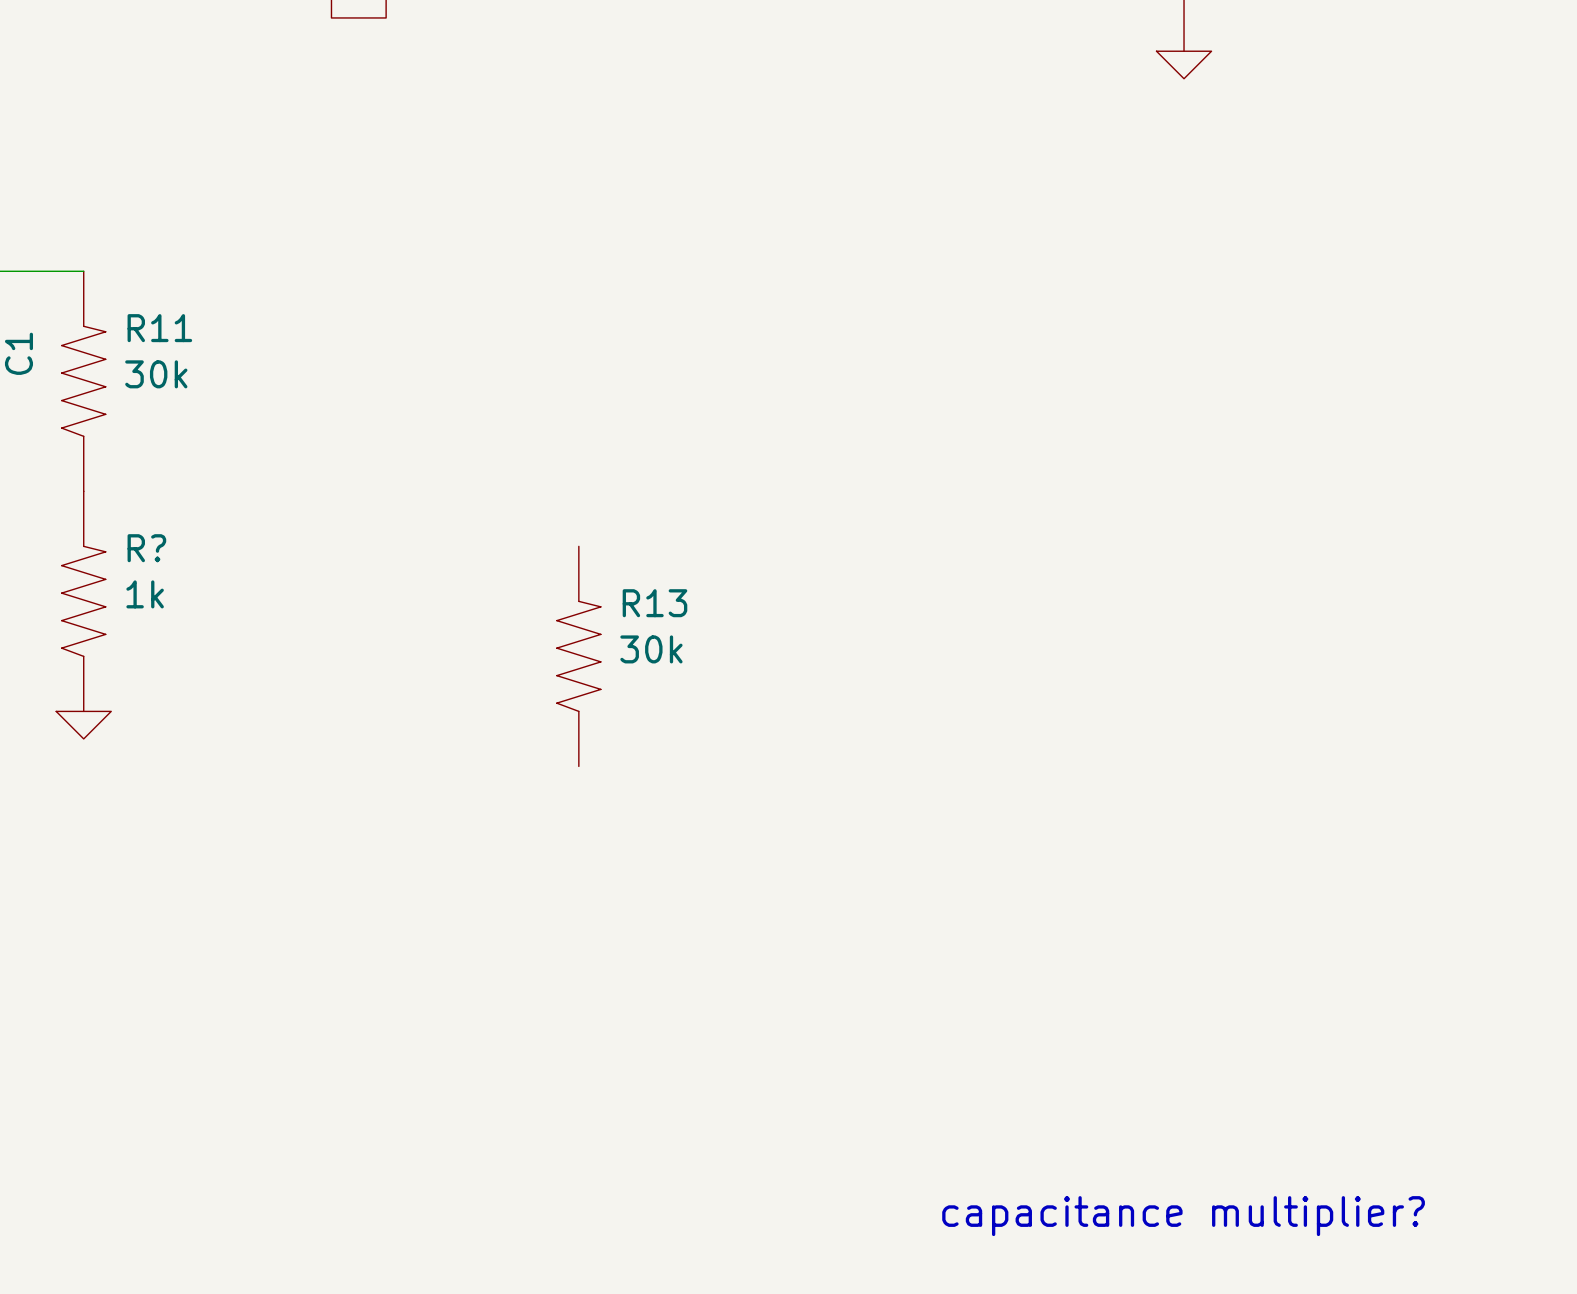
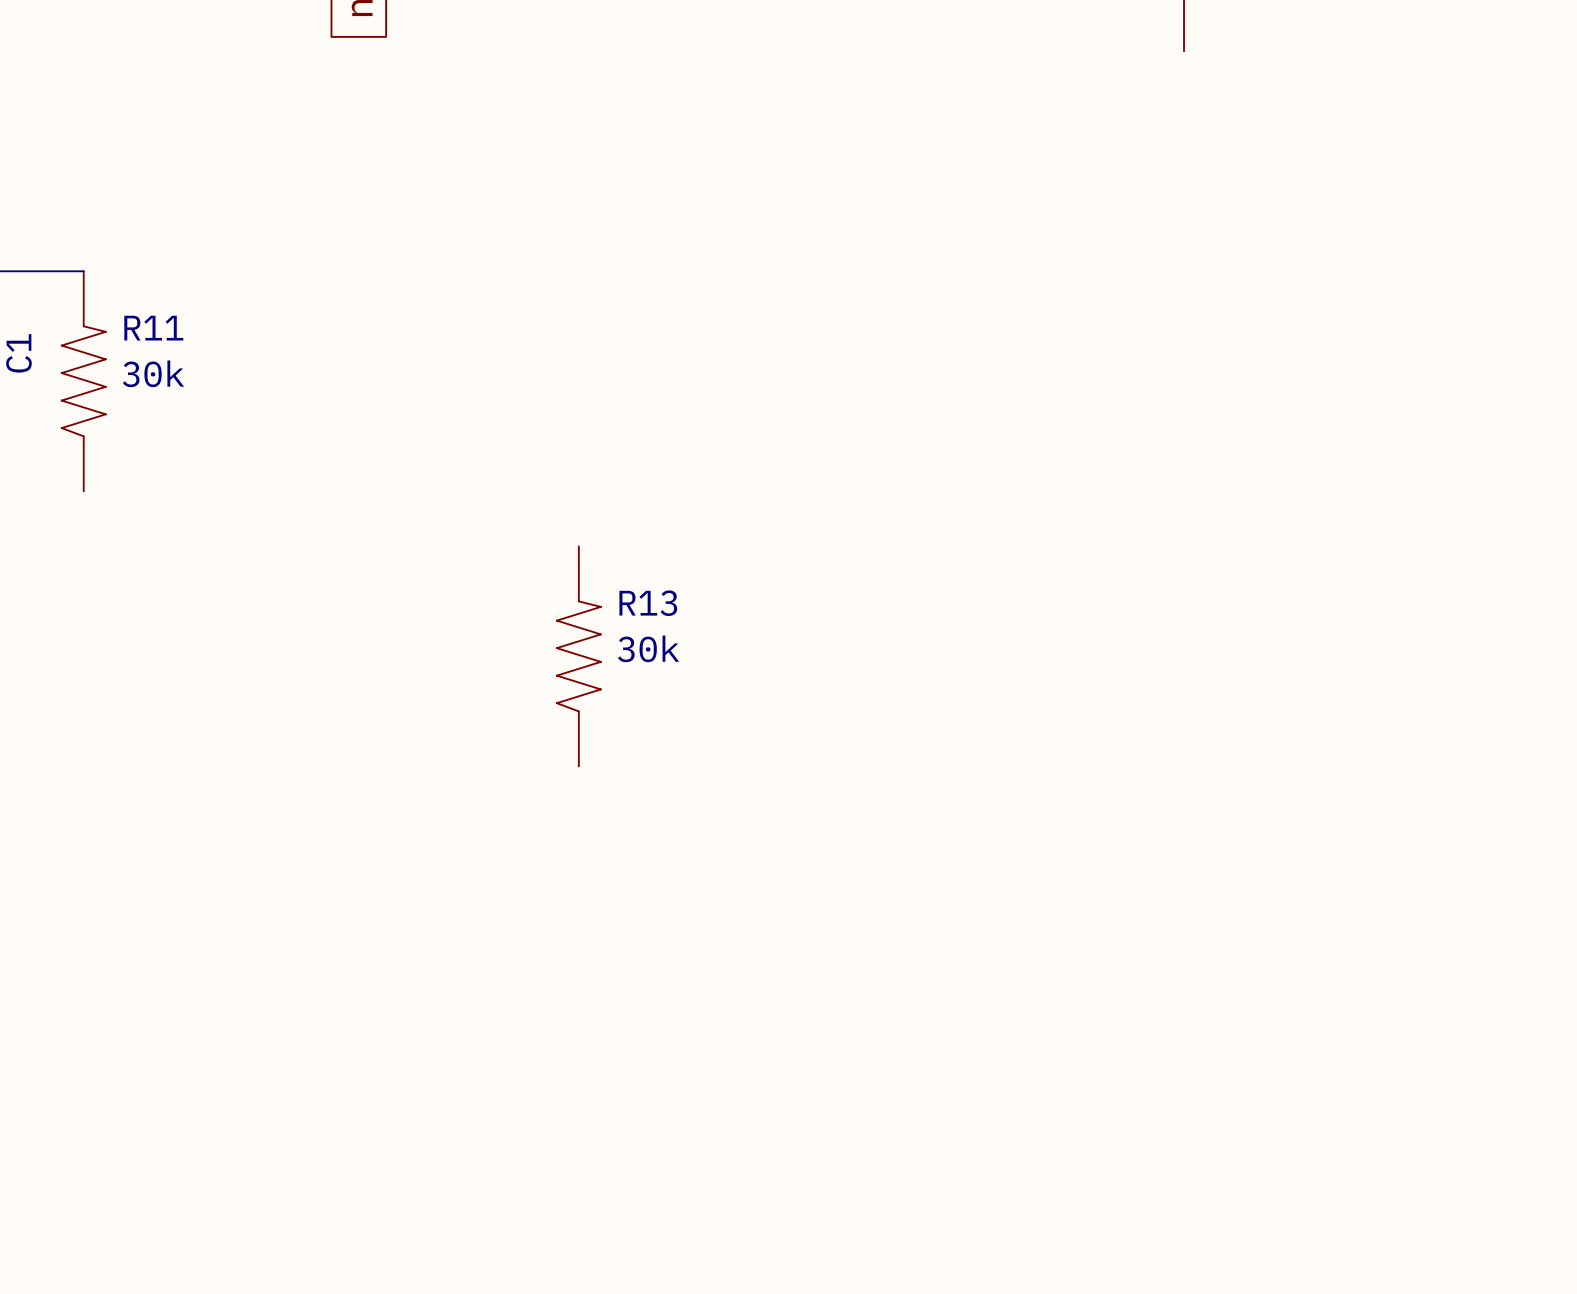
power symbol: (1184, 64) -> none
R?: 1k (83, 601) -> none
power symbol: (83, 725) -> none
text: capacitance multiplier? (1183, 1216) -> none

